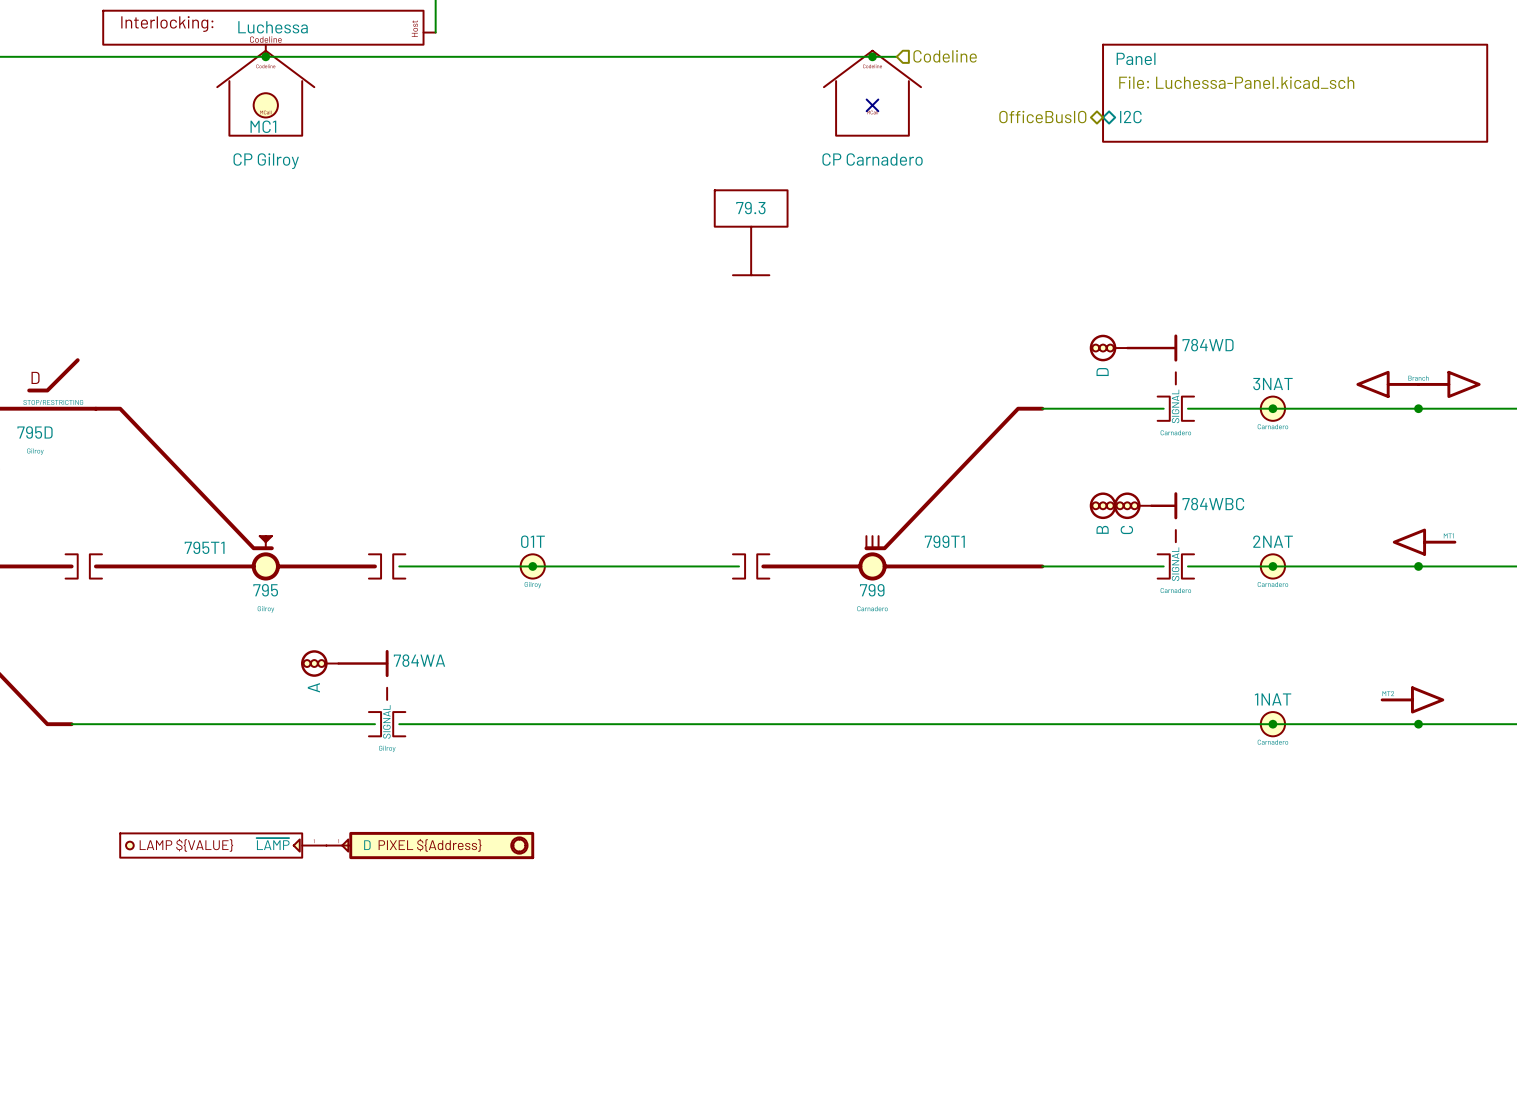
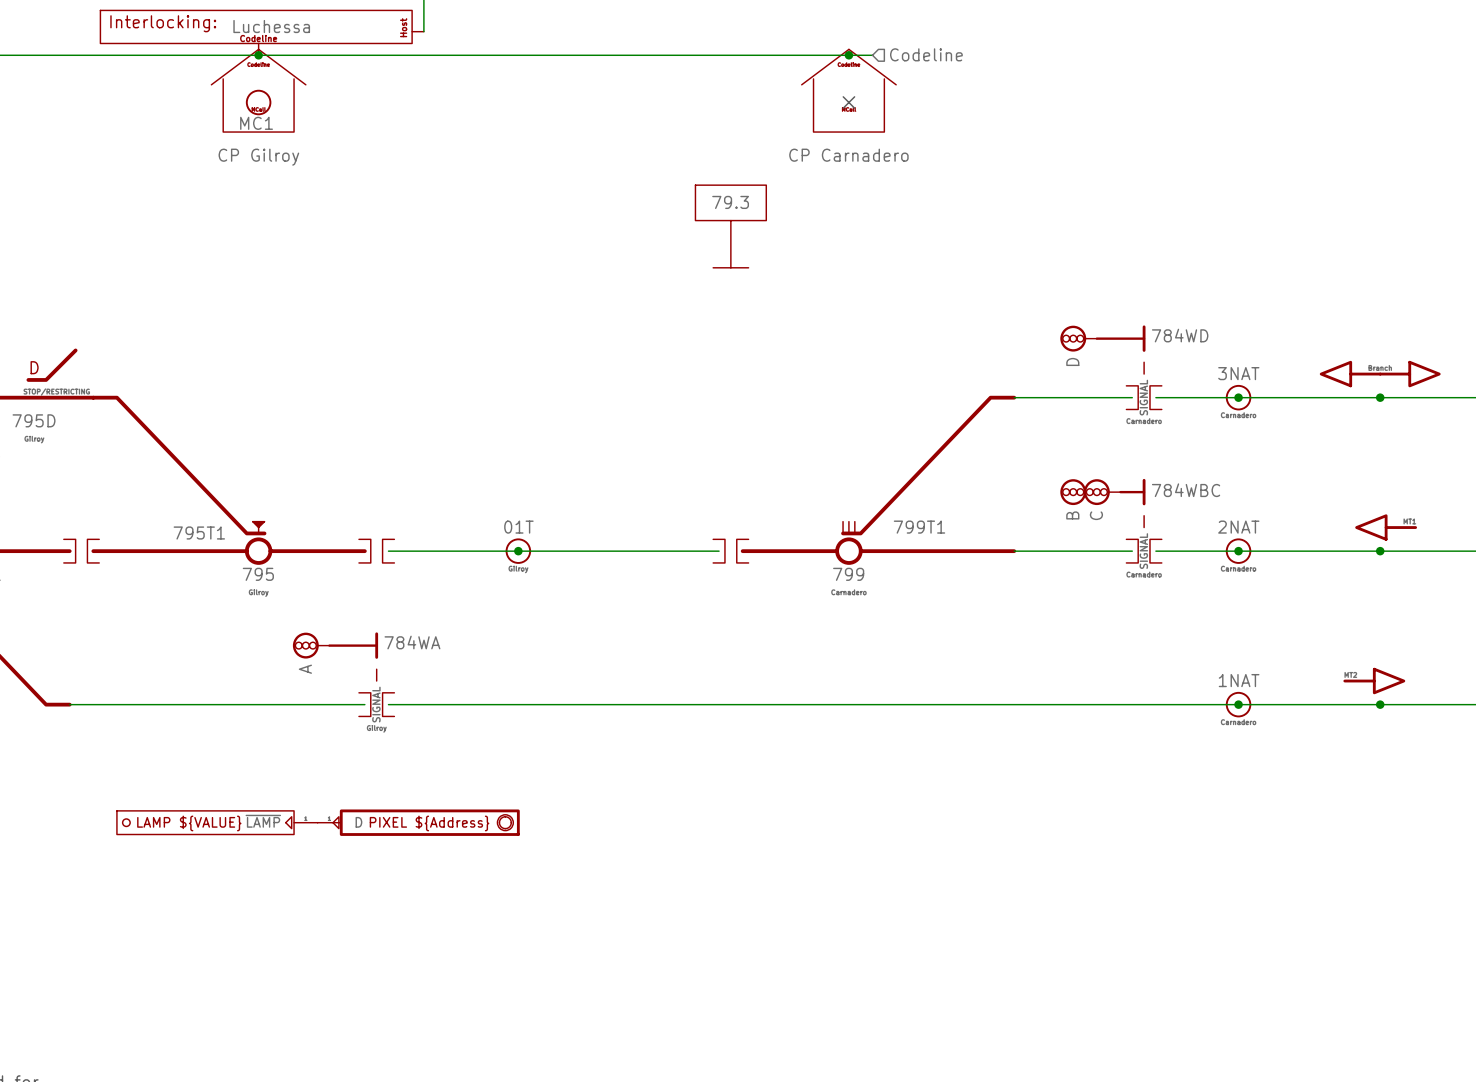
sheet Panel: File: Luchessa-Panel.kicad_sch (1295, 93) -> none
hierarchical label: OfficeBusIO (1042, 117) -> none
sheet pin: I2C (1130, 117) -> none

